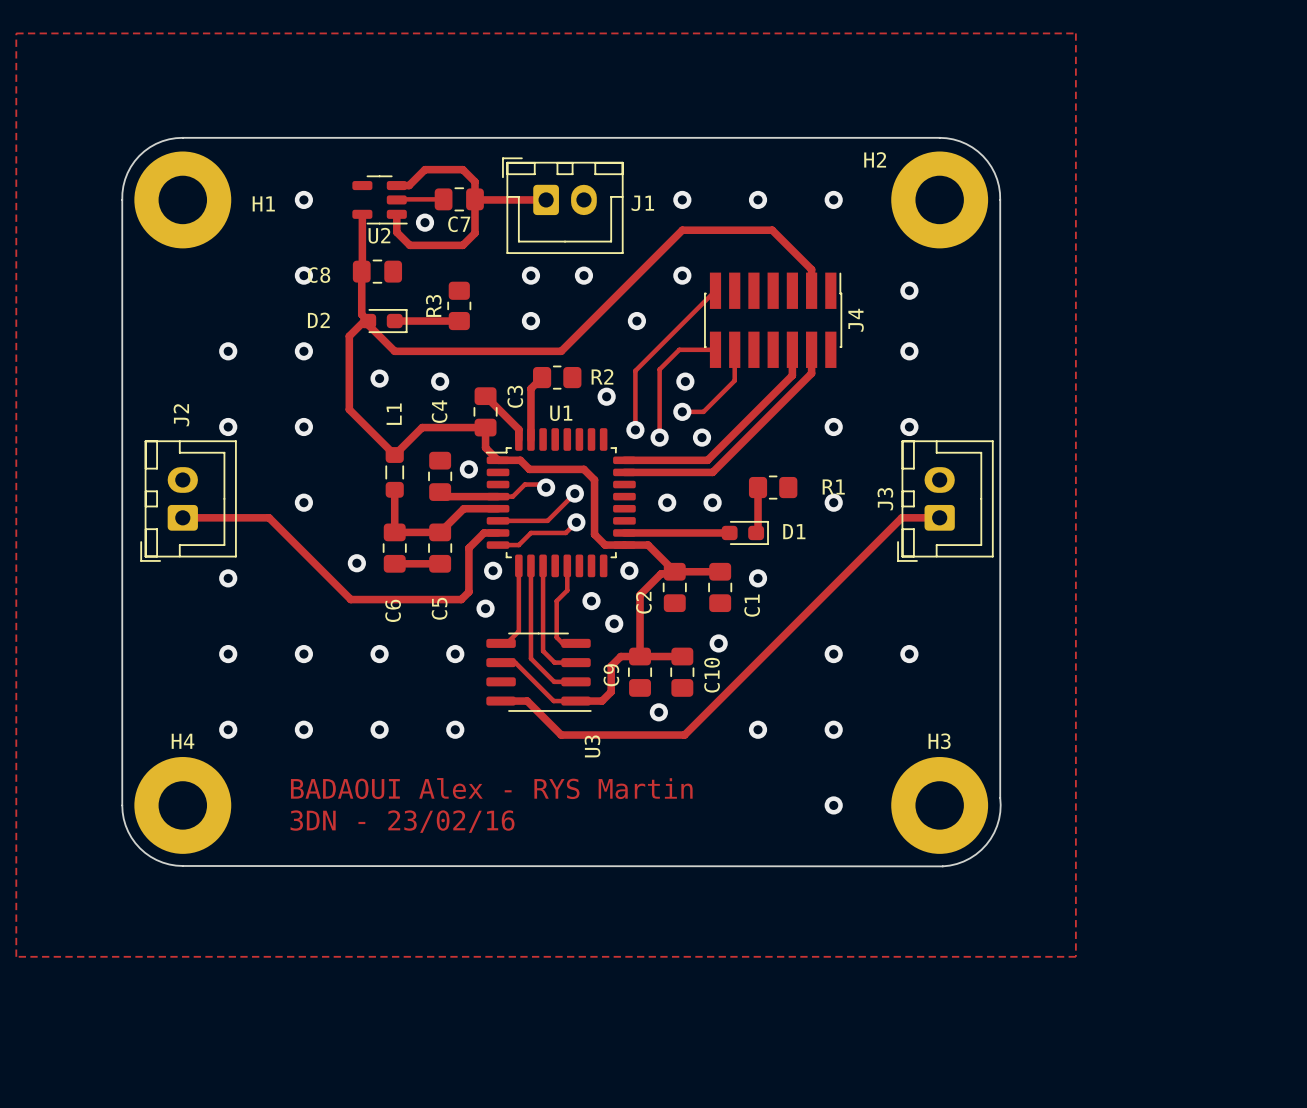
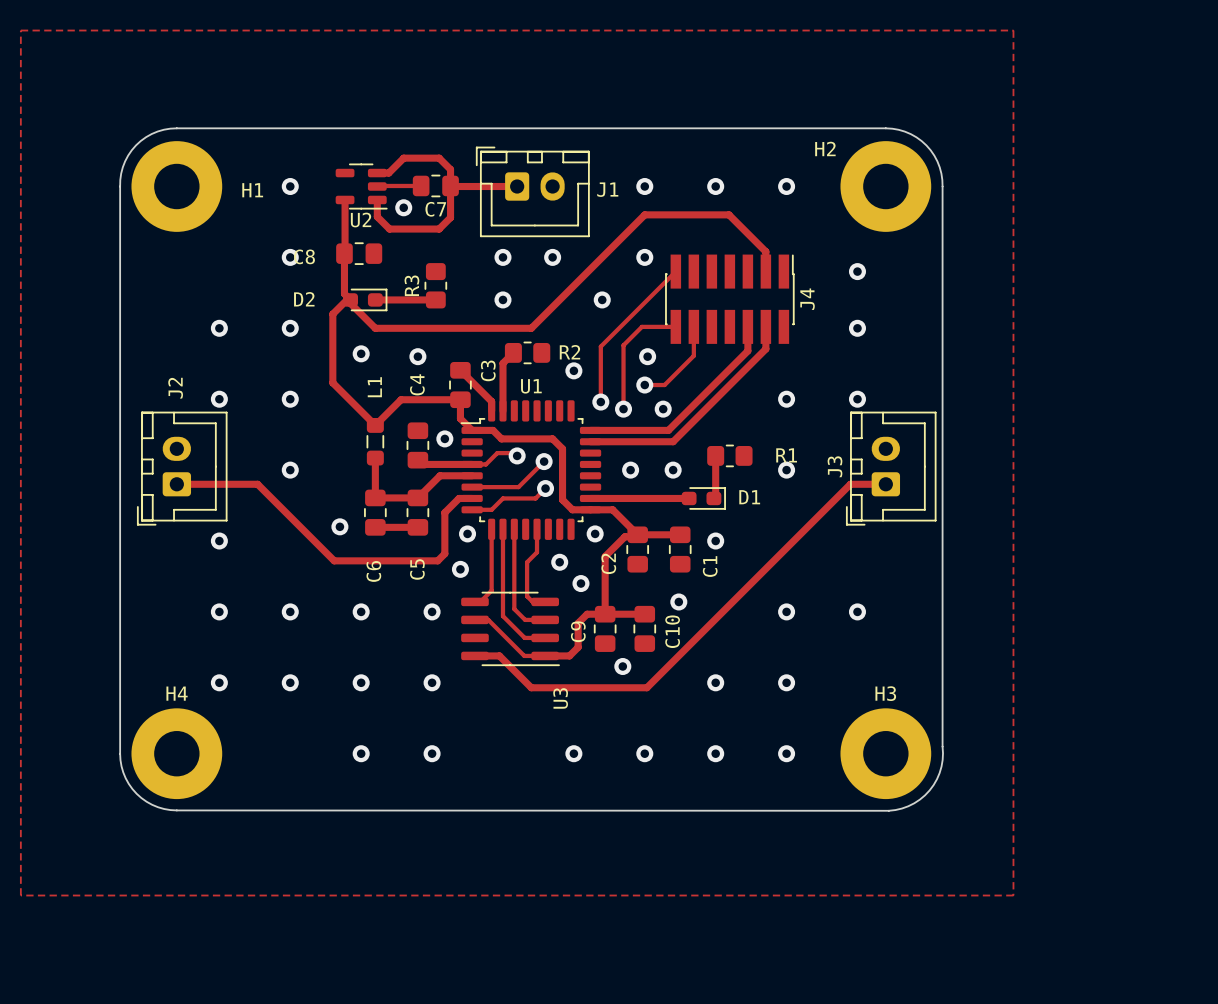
text: BADAOUI Alex - RYS Martin (491, 788) -> none
via: none -> (361, 753)
via: none -> (432, 753)
via: none -> (573, 753)
via: none -> (644, 753)
via: none -> (715, 753)
text: 3DN - 23/02/16 (402, 821) -> none

